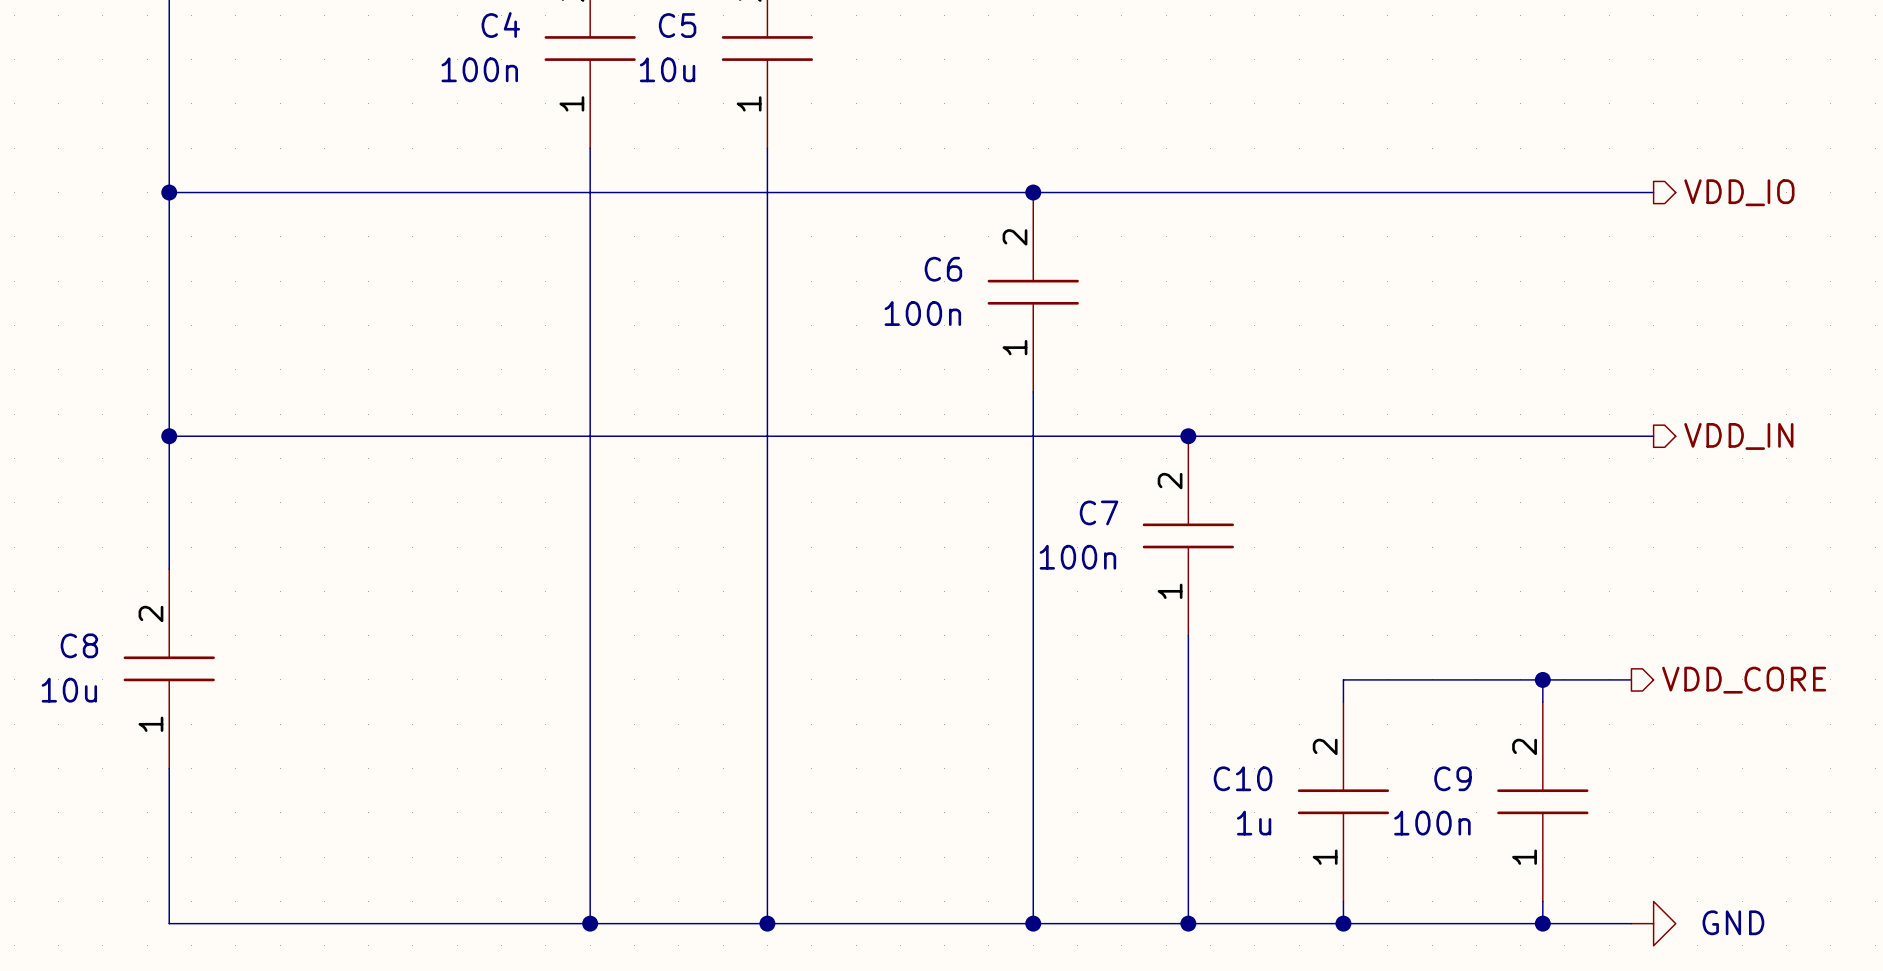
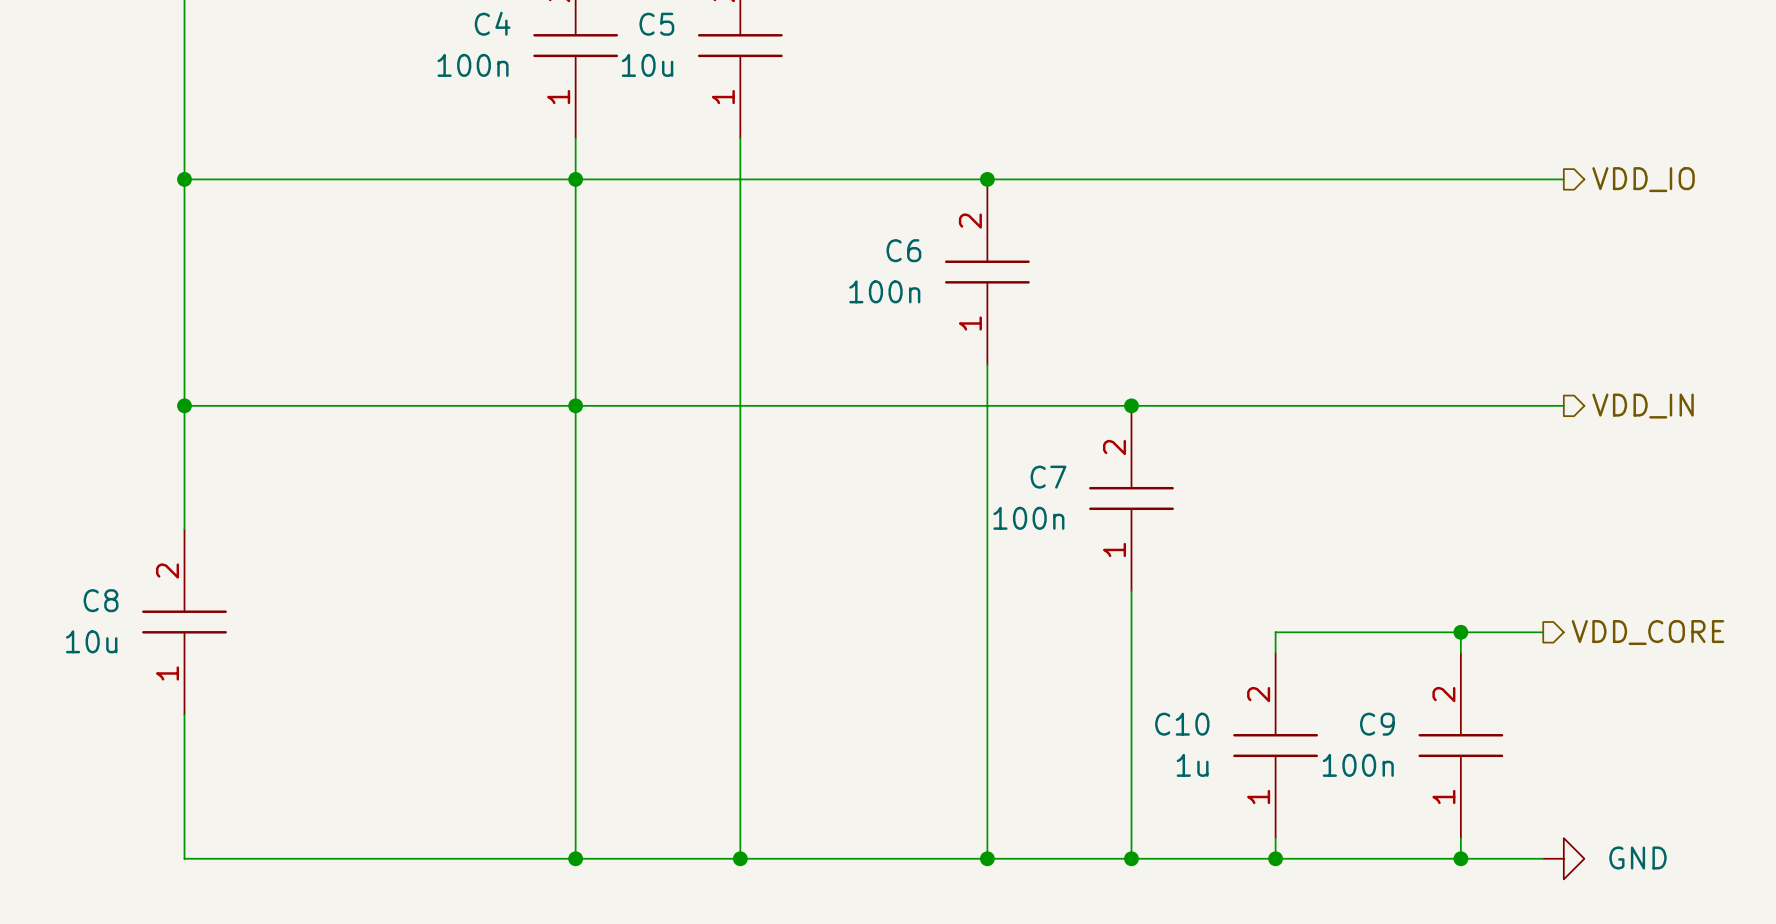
junction: none -> (575, 179)
junction: none -> (575, 405)

